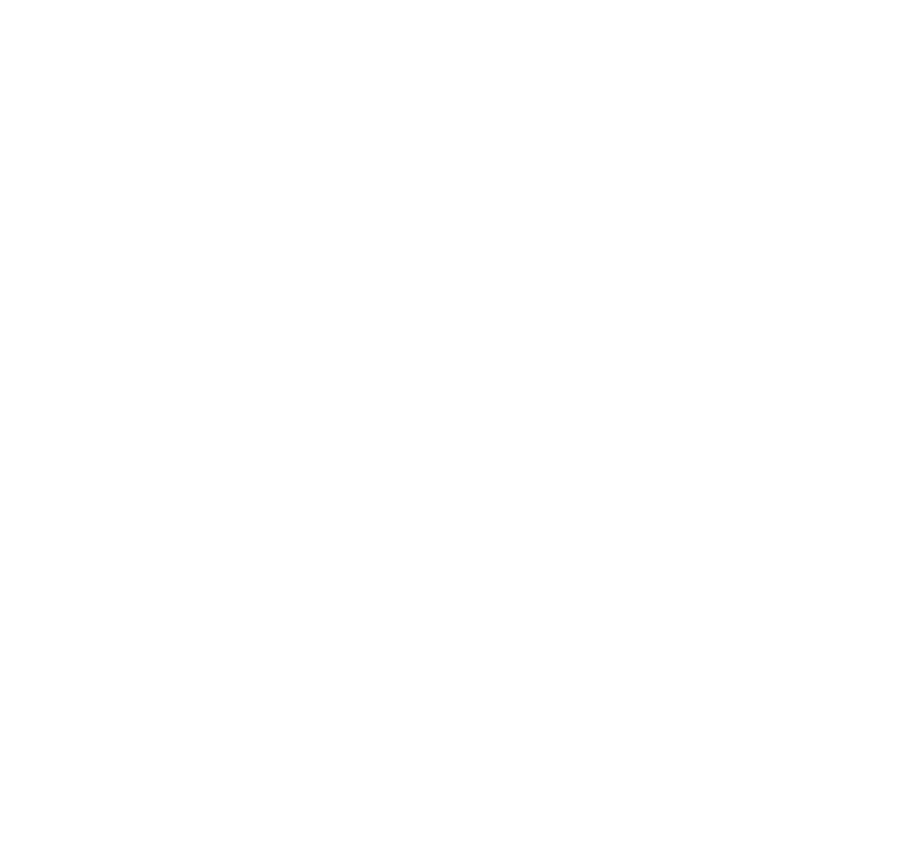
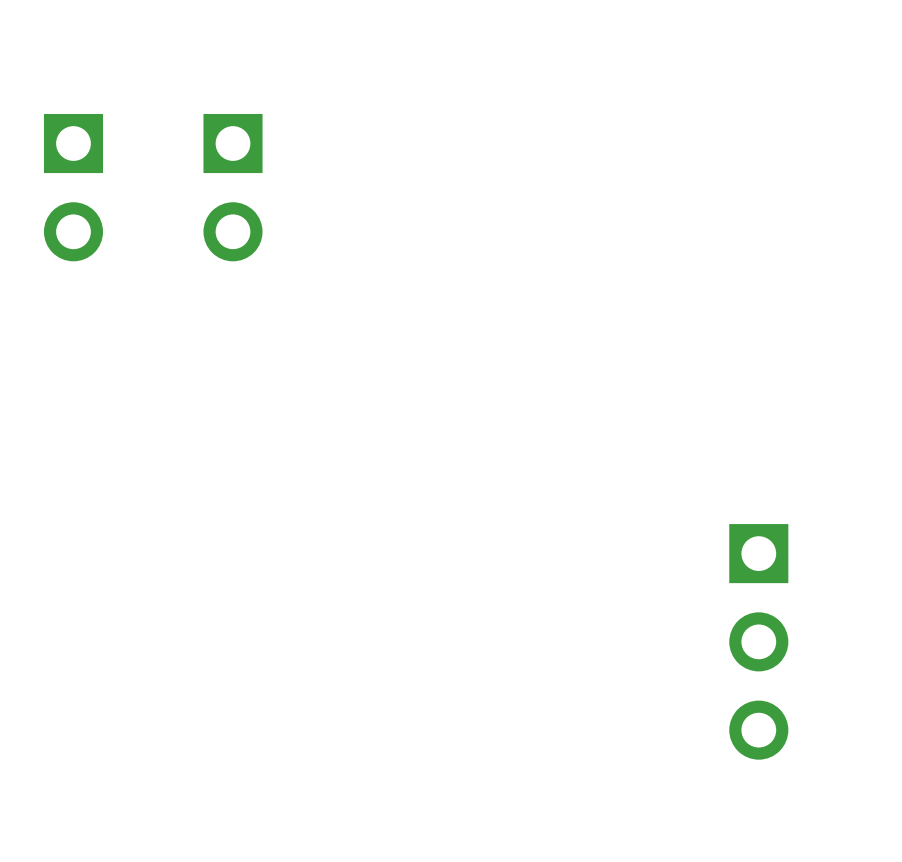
part: none -> (73, 187)
part: none -> (233, 187)
part: none -> (758, 641)

